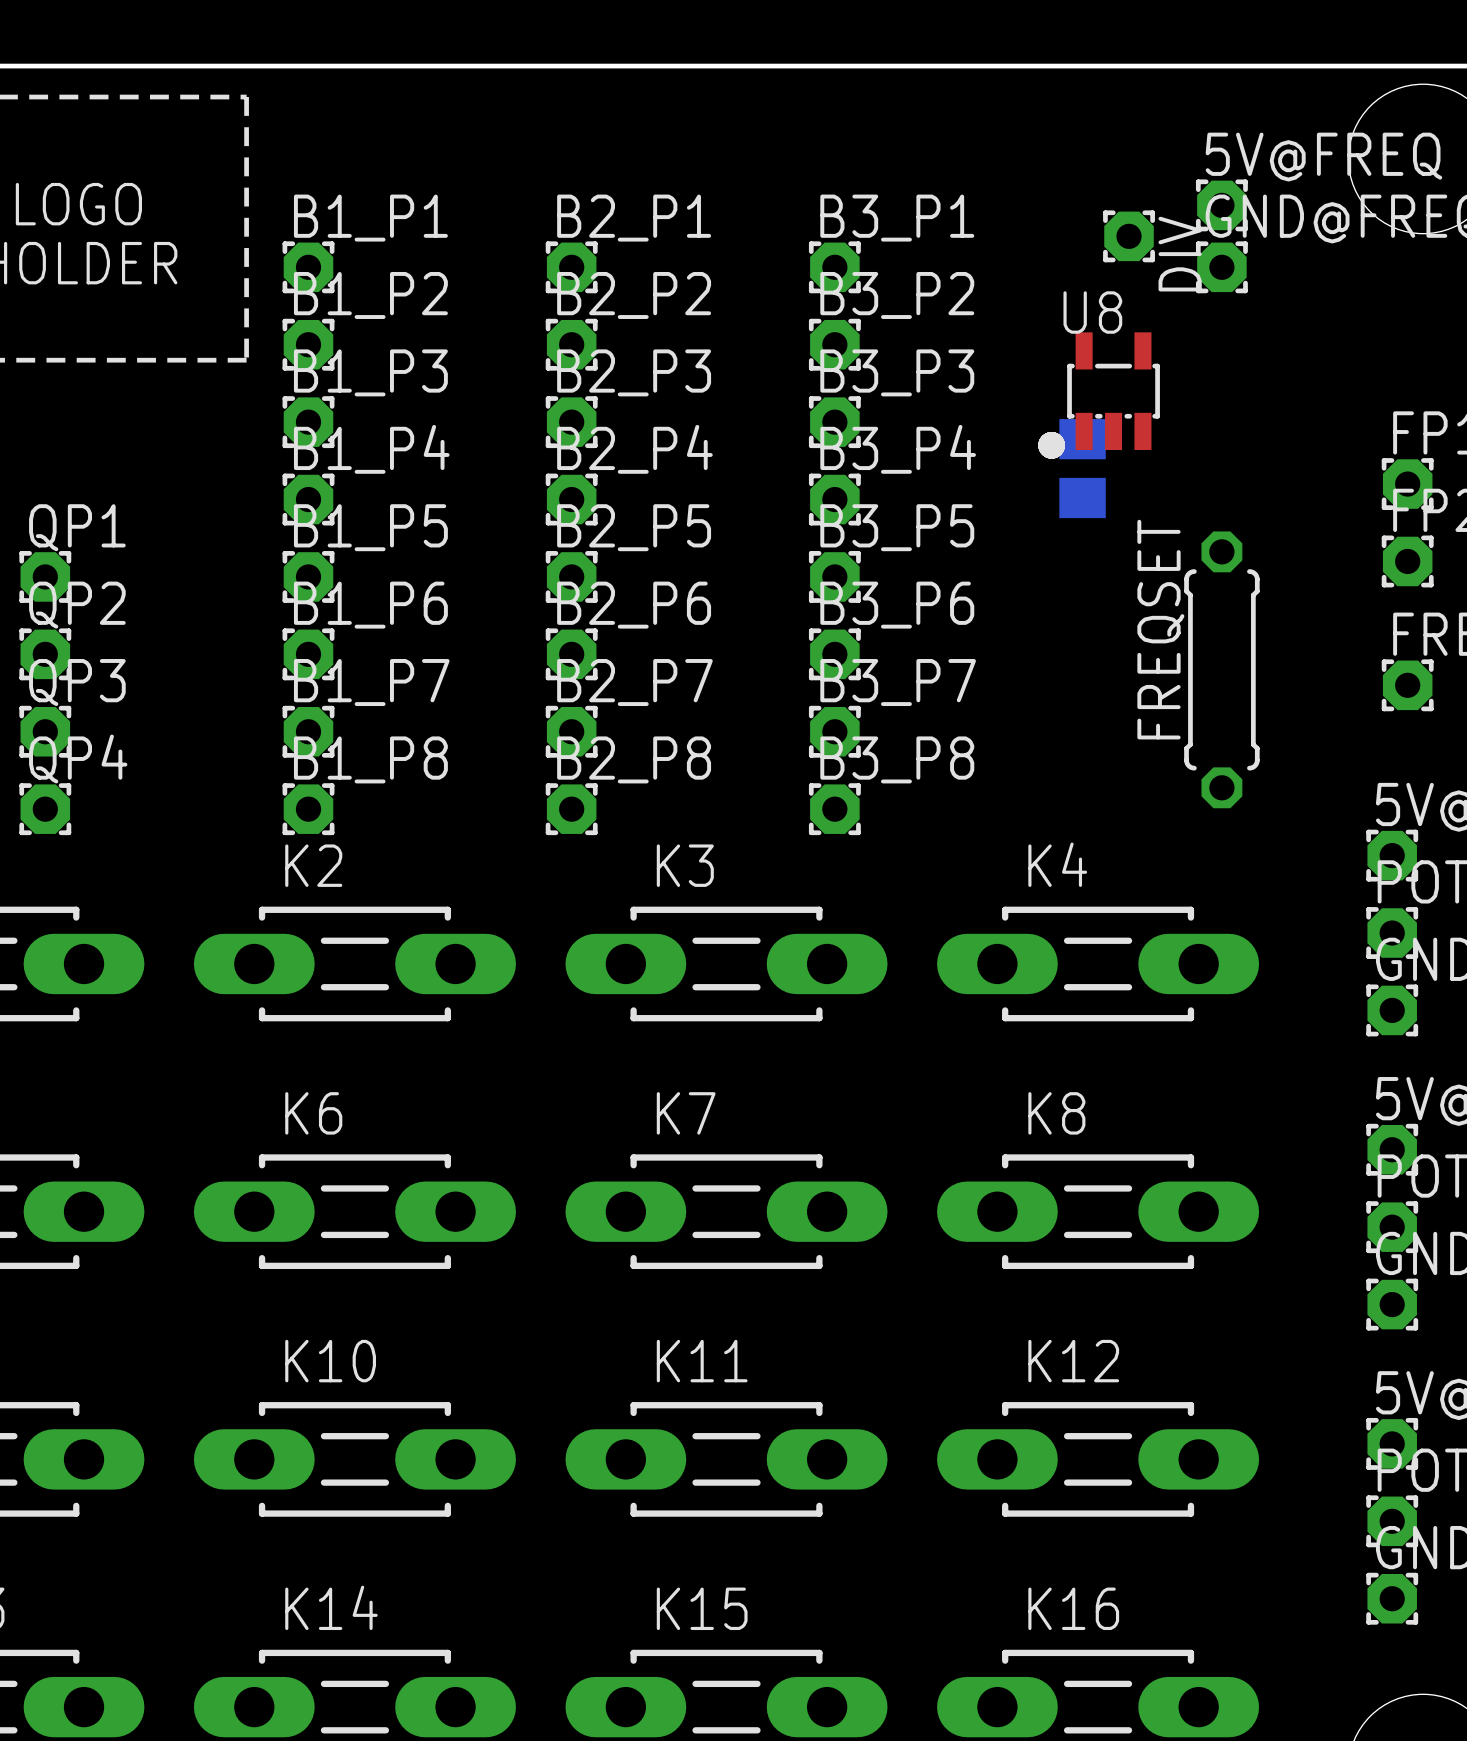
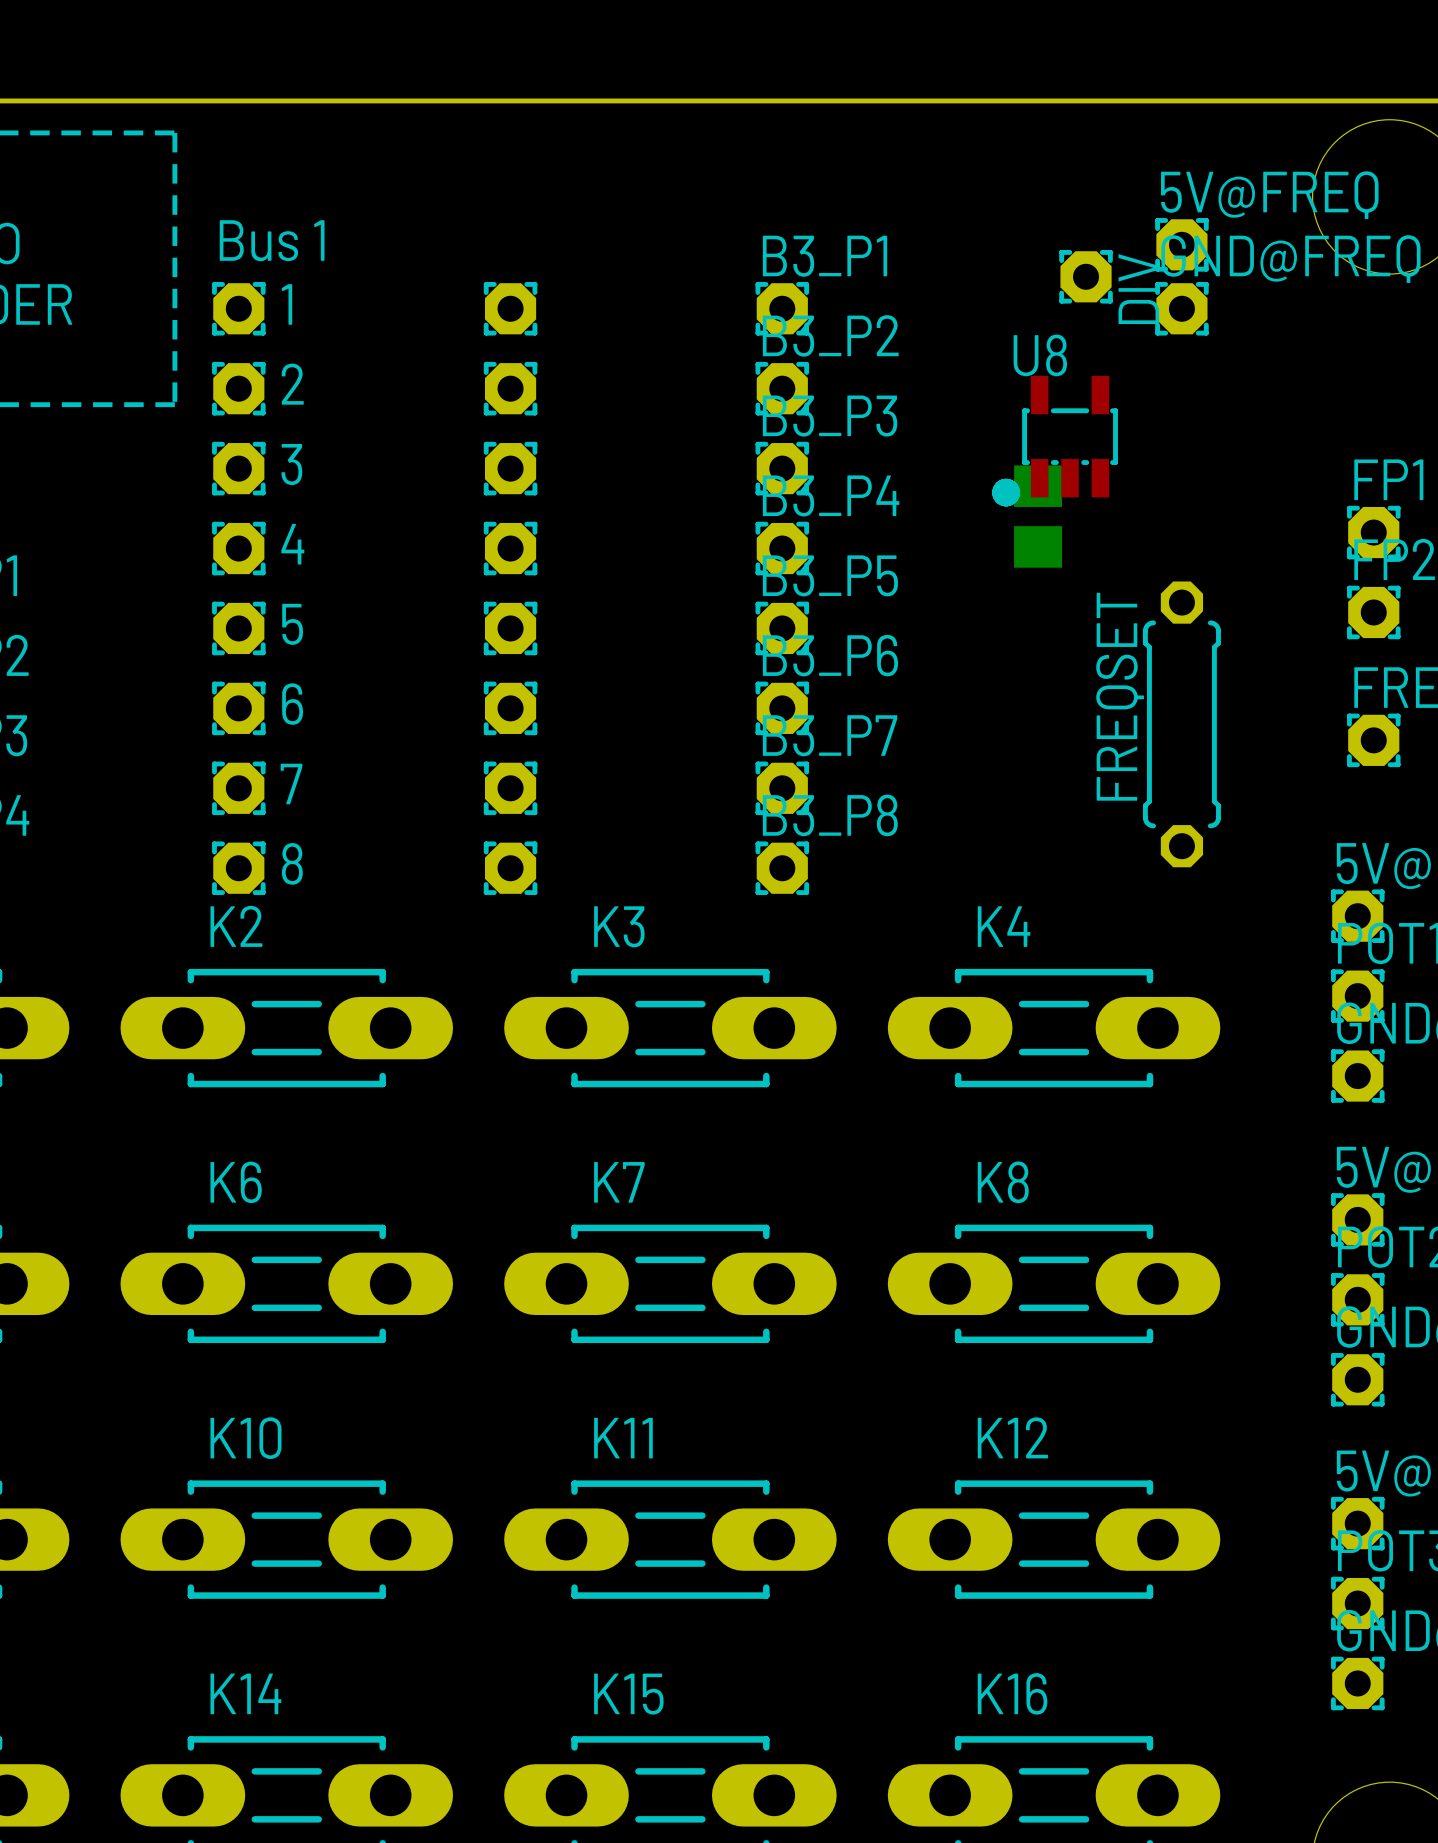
text: none -> Bus 1 (272, 240)
B1_P1 name: B1_P1 (370, 218) -> none
B2_P1 name: B2_P1 (634, 218) -> none
text: none -> 1 (287, 304)
B1_P2 name: B1_P2 (370, 295) -> none
B2_P2 name: B2_P2 (634, 295) -> none
text: none -> 2 (292, 384)
B1_P3 name: B1_P3 (370, 372) -> none
B2_P3 name: B2_P3 (634, 372) -> none
text: none -> 3 (291, 464)
B1_P4 name: B1_P4 (371, 449) -> none
B2_P4 name: B2_P4 (634, 449) -> none
text: none -> 4 (292, 544)
B1_P5 name: B1_P5 (370, 527) -> none
B2_P5 name: B2_P5 (634, 527) -> none
text: none -> 5 (292, 624)
B1_P6 name: B1_P6 (370, 605) -> none
B2_P6 name: B2_P6 (634, 605) -> none
text: none -> 6 (292, 704)
B1_P7 name: B1_P7 (371, 682) -> none
B2_P7 name: B2_P7 (634, 682) -> none
text: none -> 7 (291, 784)
B1_P8 name: B1_P8 (370, 759) -> none
B2_P8 name: B2_P8 (634, 759) -> none
text: none -> 8 (292, 863)

